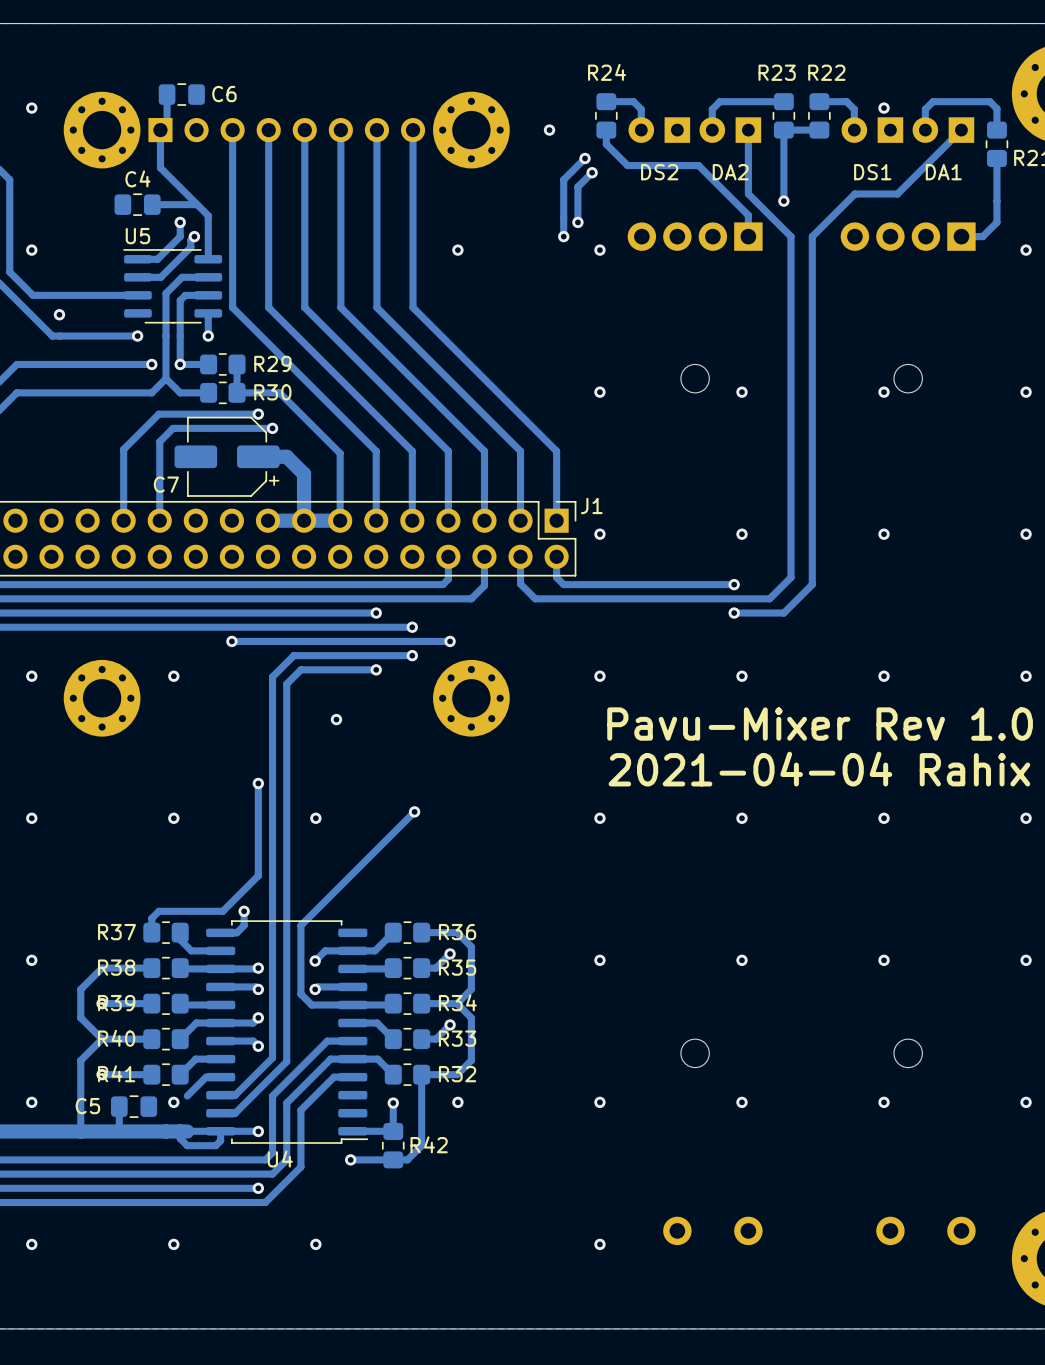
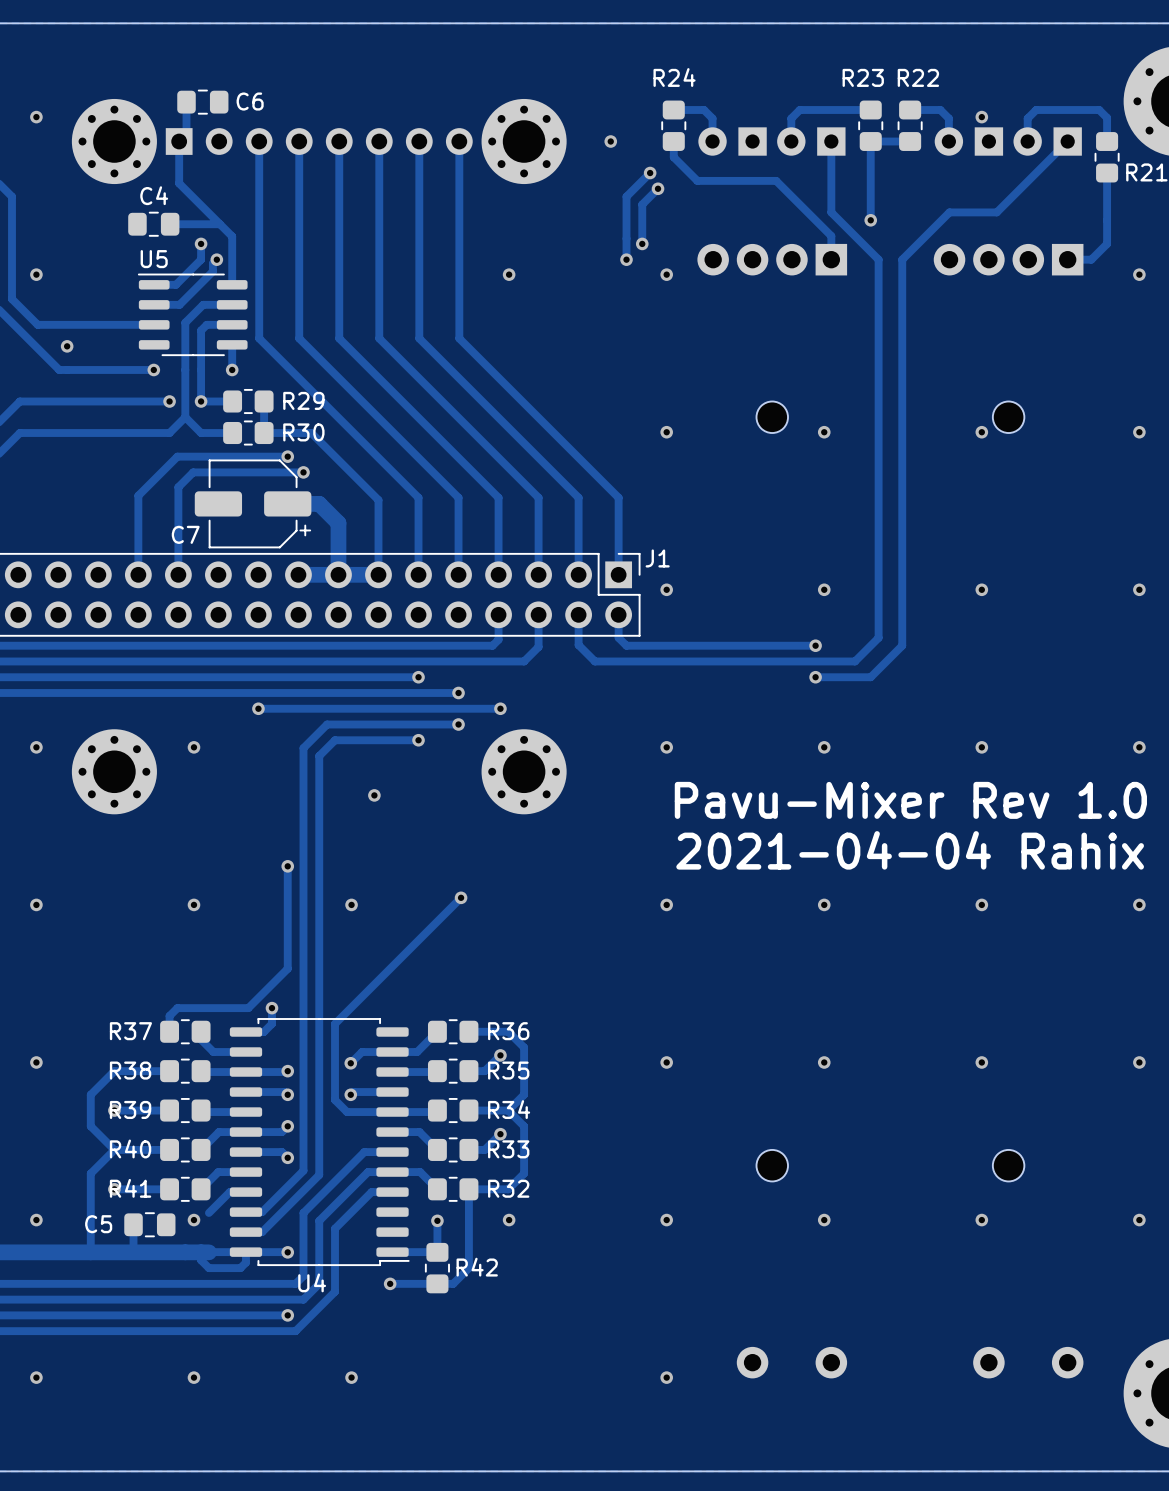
DS2 name: DS2 (659, 172) -> none
DA2 name: DA2 (730, 172) -> none
DS1 name: DS1 (872, 172) -> none
DA1 name: DA1 (943, 172) -> none

